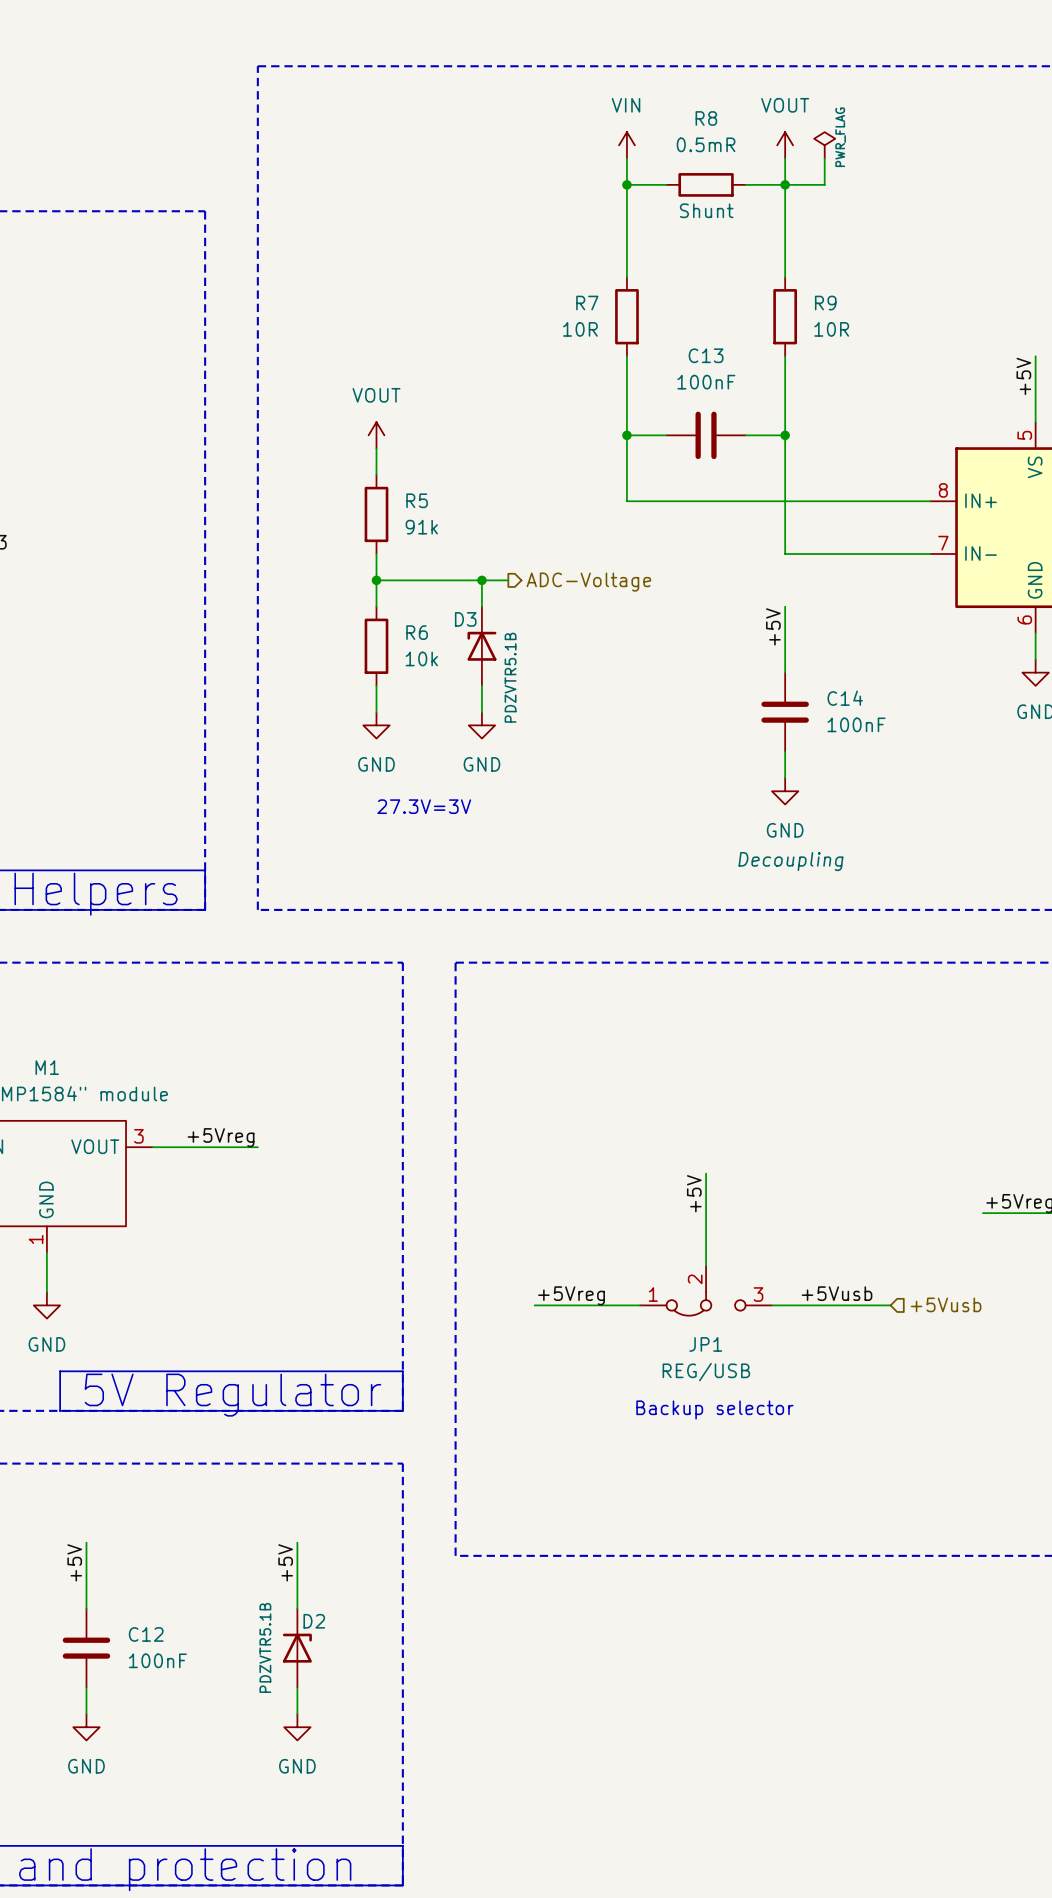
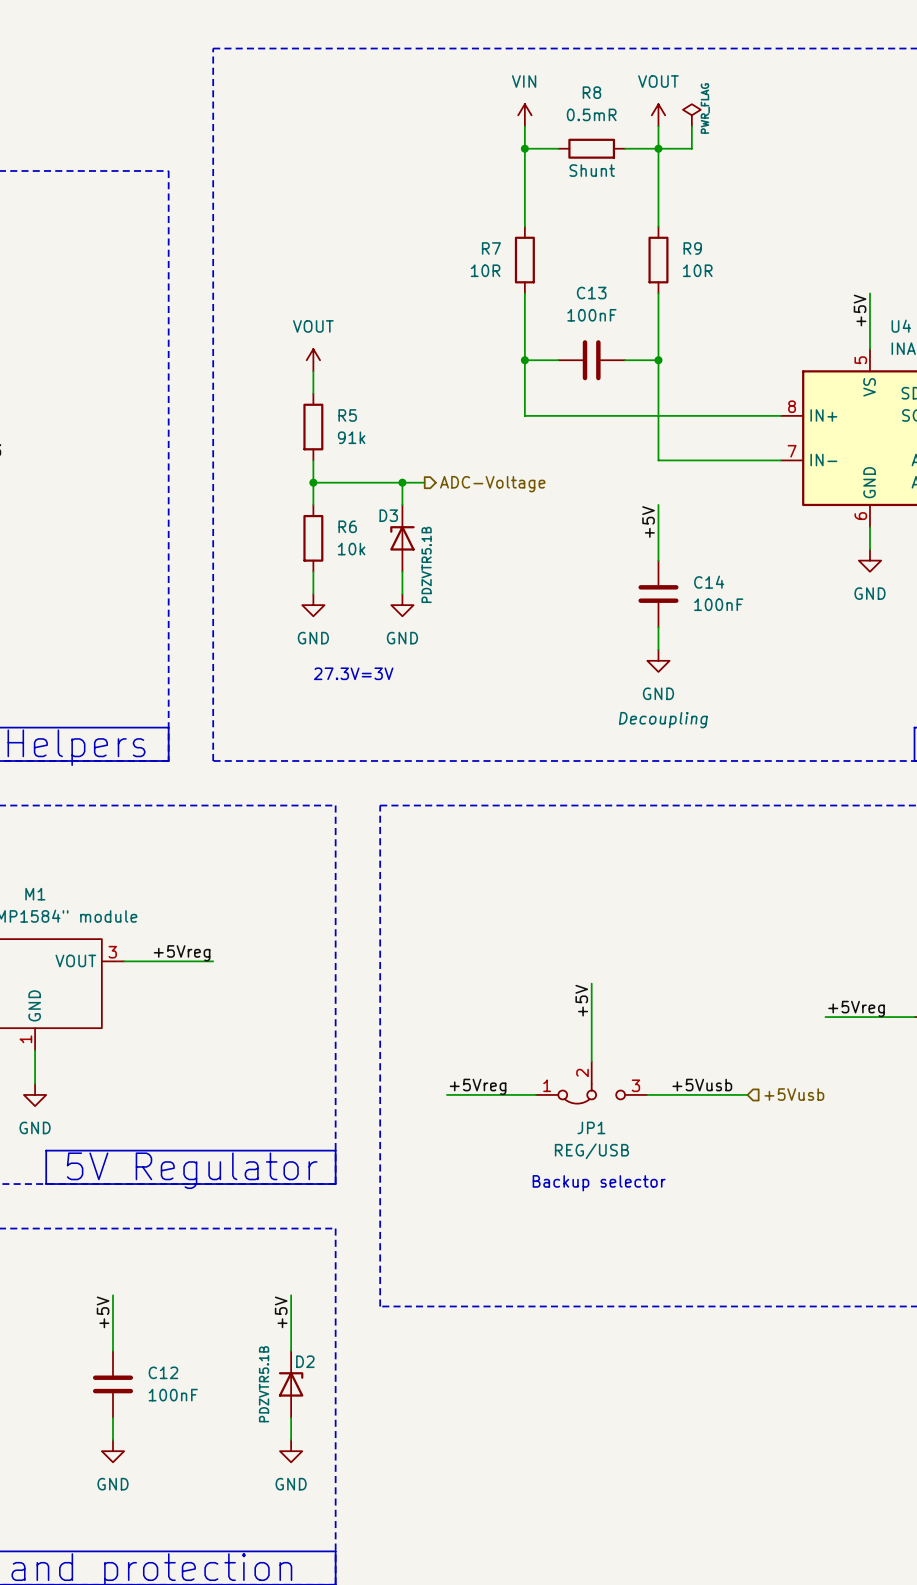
wire: (86, 1542) (86, 1608) -> (113, 1295) (113, 1351)
wire: (297, 1542) (297, 1608) -> (291, 1295) (291, 1351)
label position: +5V (74, 1562) -> +5V (103, 1312)
label position: +5V (285, 1562) -> +5V (281, 1312)
C12 position: (86, 1648) -> (113, 1384)
D2 position: (297, 1648) -> (291, 1384)
wire: (86, 1687) (86, 1714) -> (113, 1417) (113, 1440)
wire: (297, 1687) (297, 1714) -> (291, 1417) (291, 1440)
power symbol position: GND (86, 1727) -> GND (113, 1451)
power symbol position: GND (297, 1727) -> GND (291, 1451)

